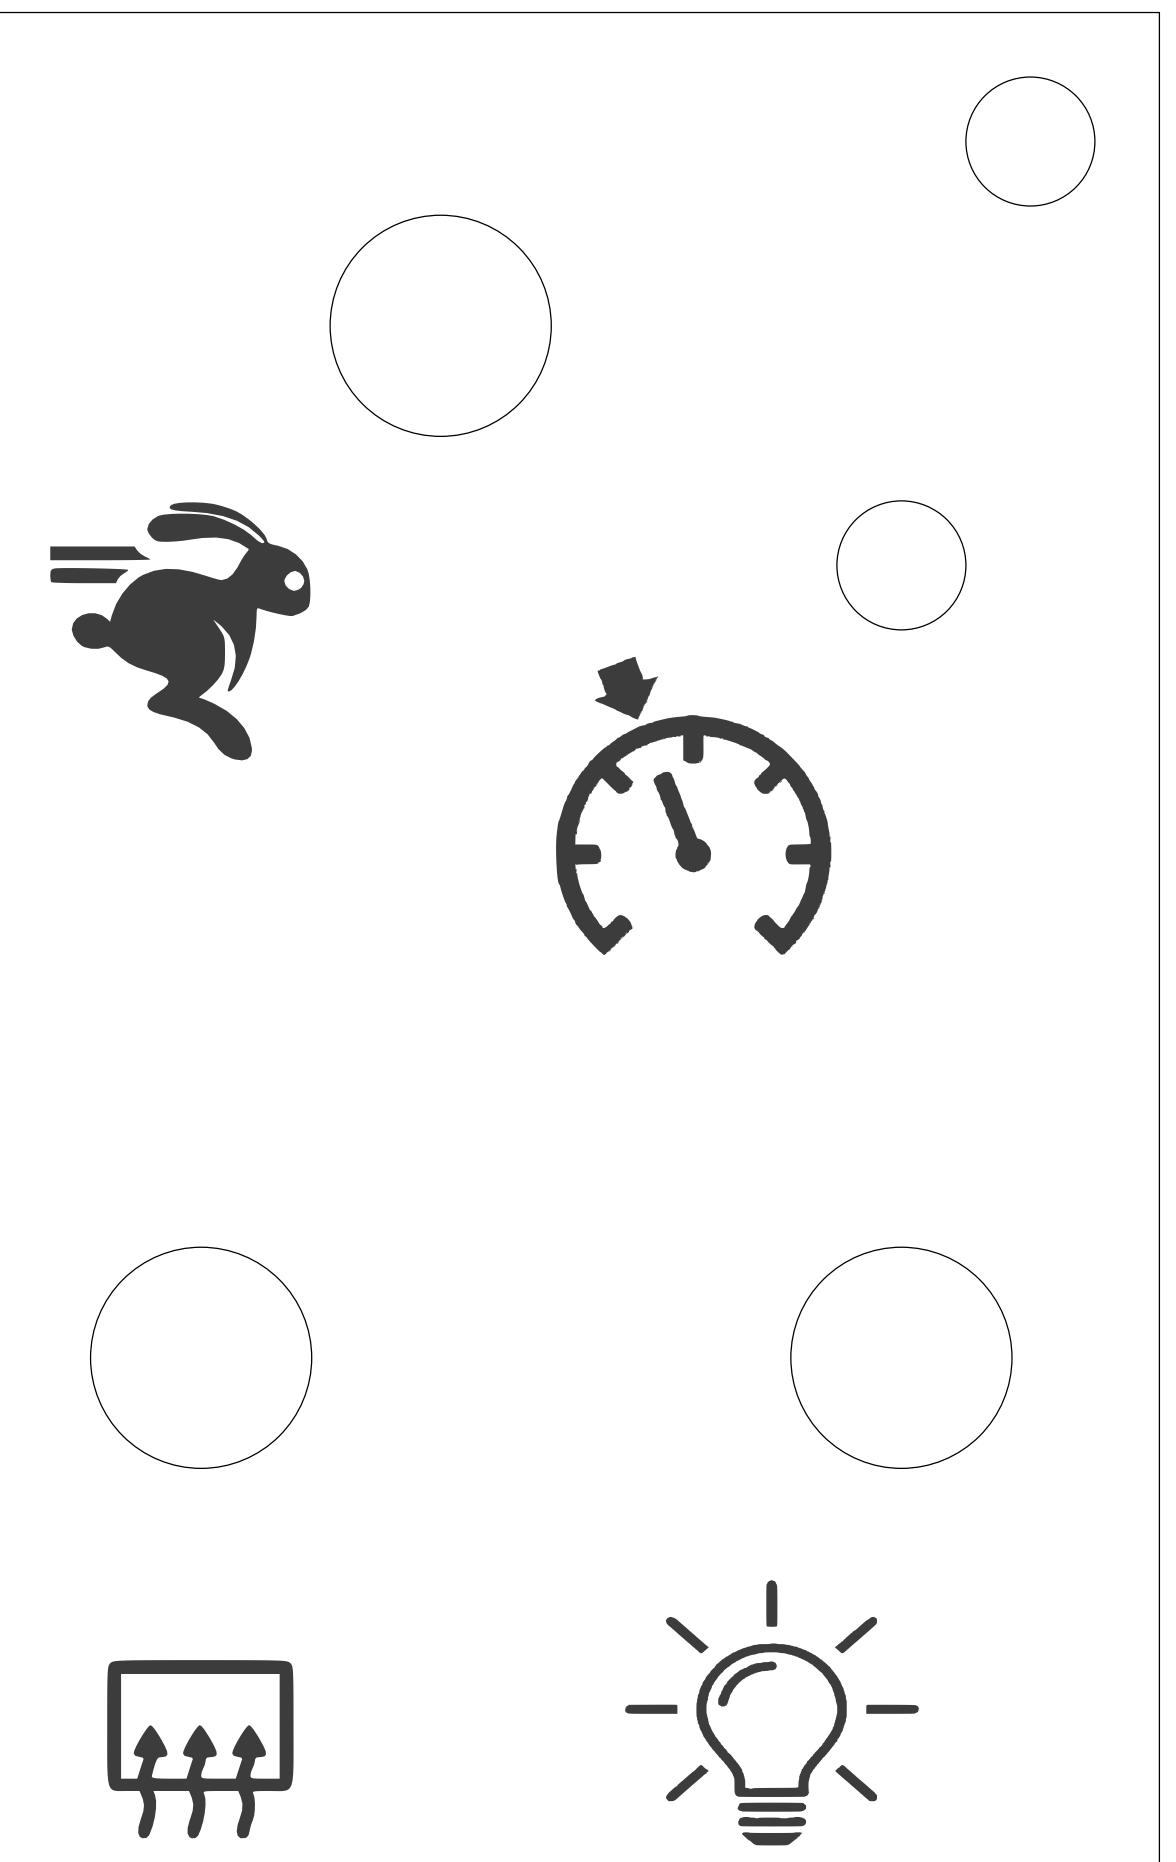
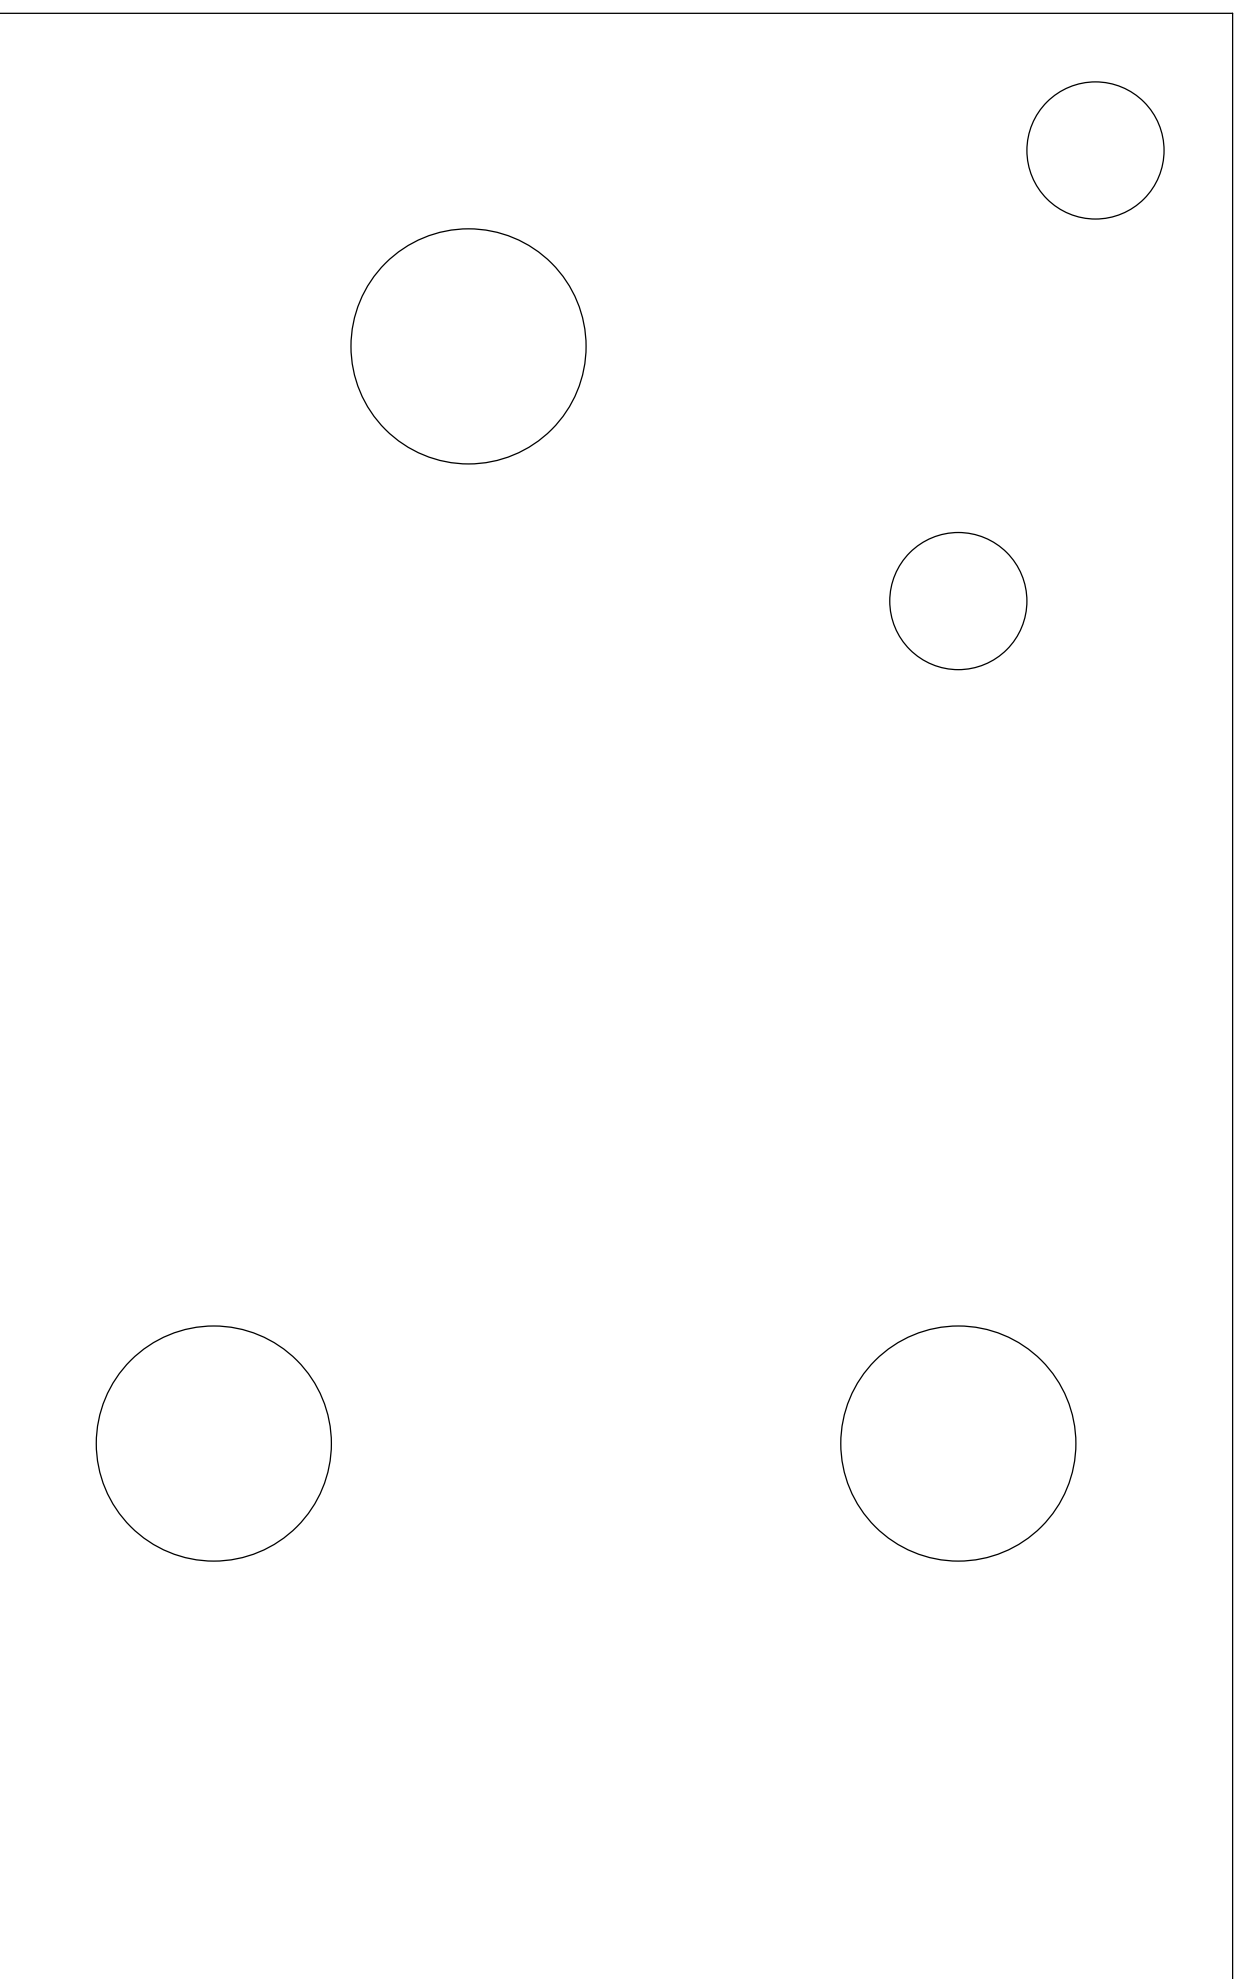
part: (180, 631) -> none
drawing: [556, 656, 832, 955] -> none
drawing: [625, 1579, 920, 1846] -> none
drawing: [107, 1660, 294, 1839] -> none

